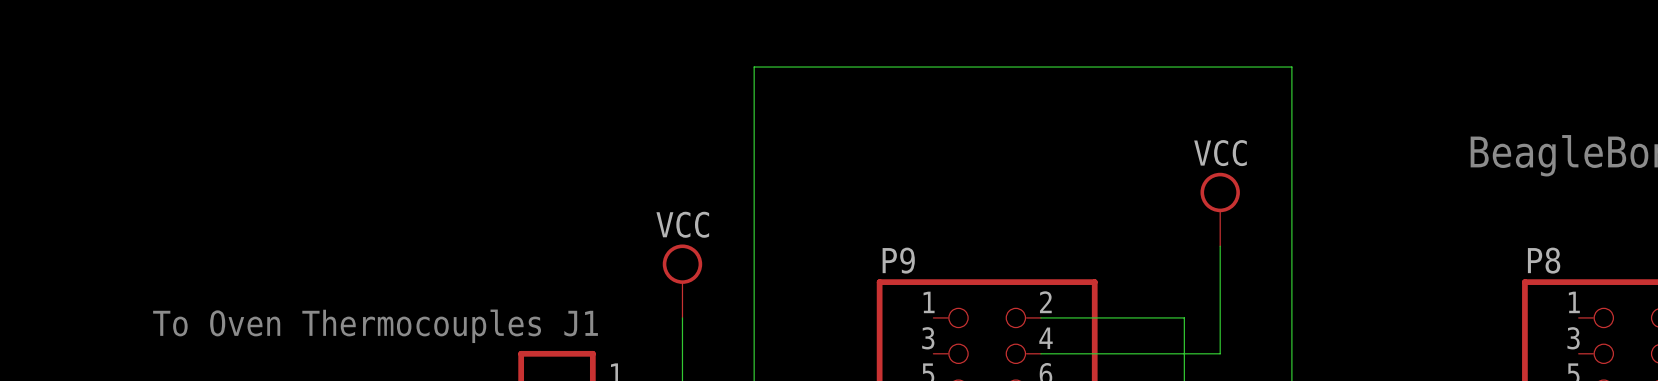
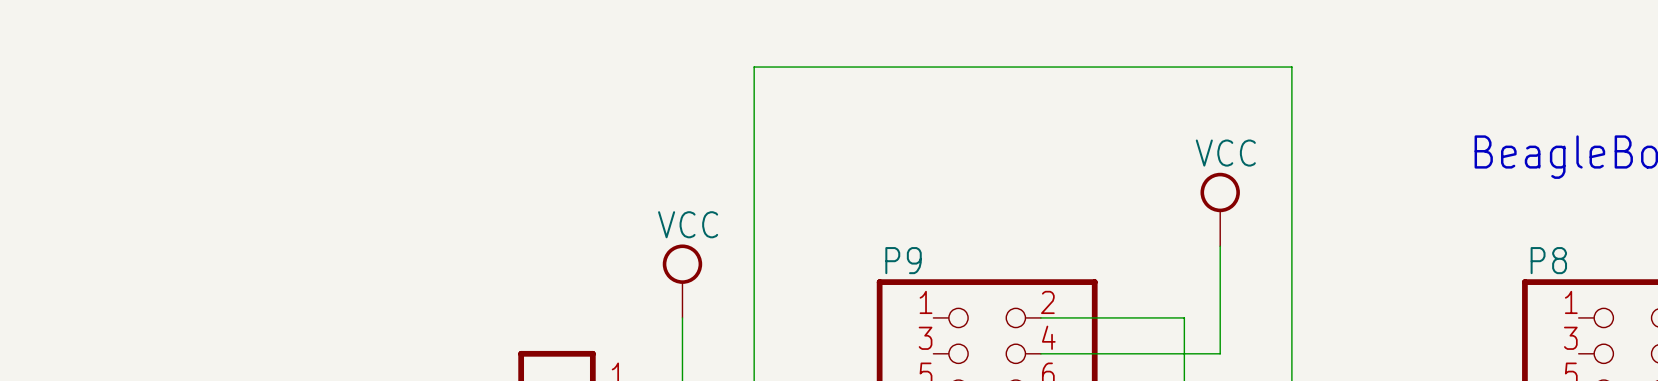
text: To Oven Thermocouples J1 (375, 326) -> none

